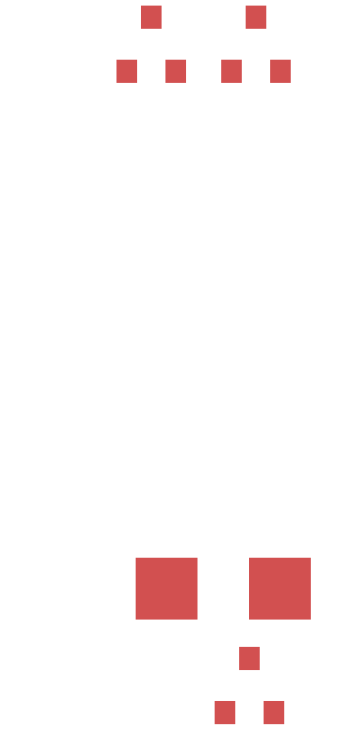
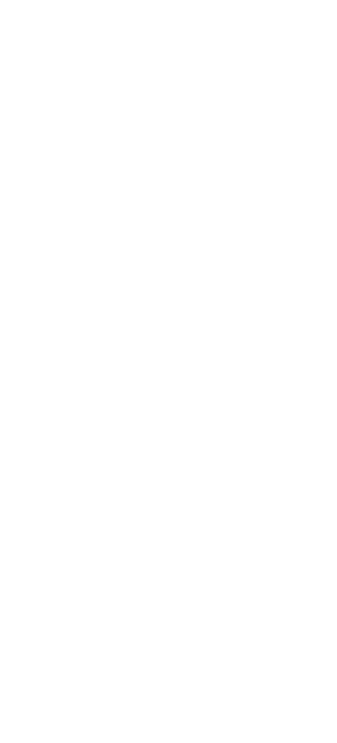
part: (151, 44) -> none
part: (255, 44) -> none
part: (223, 588) -> none
part: (249, 685) -> none

